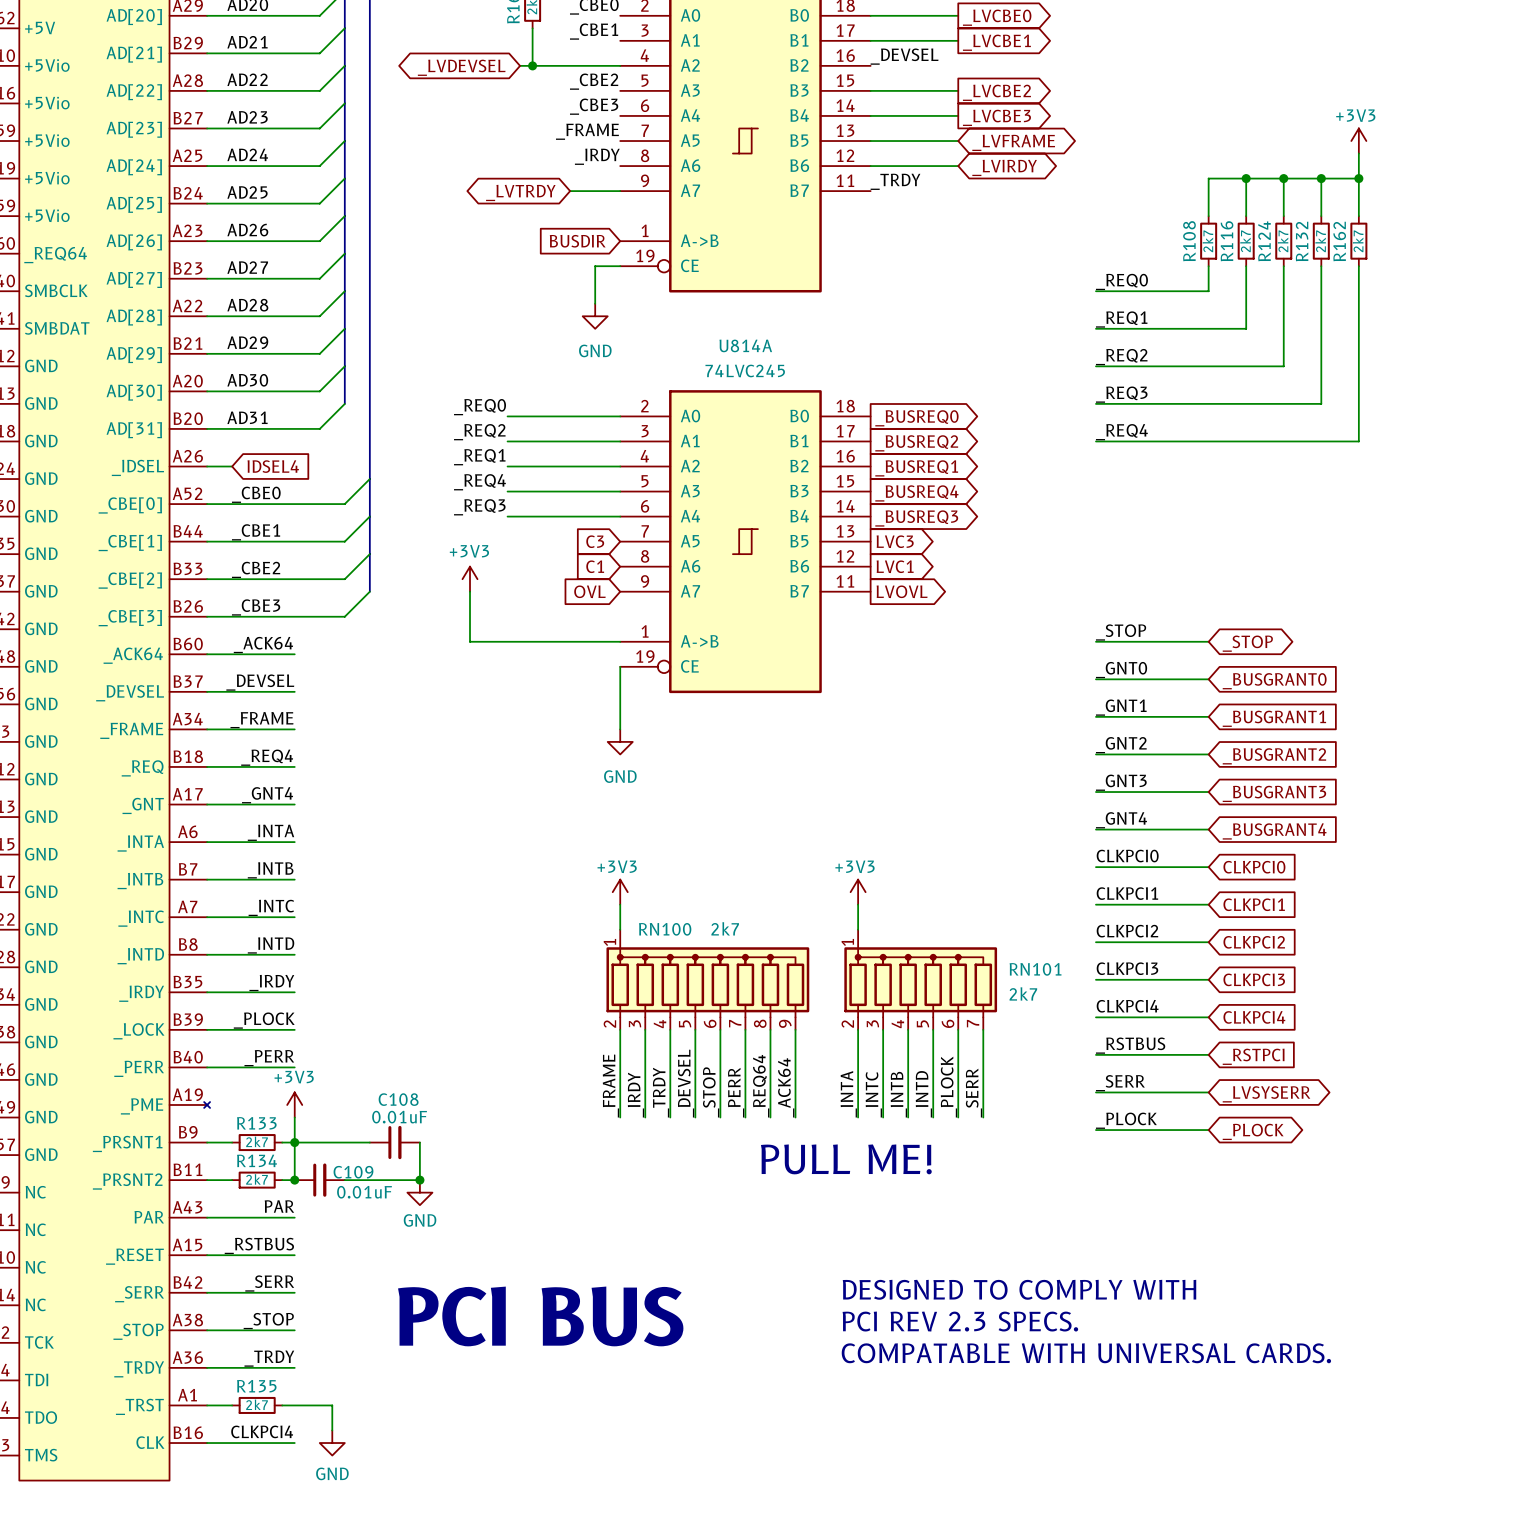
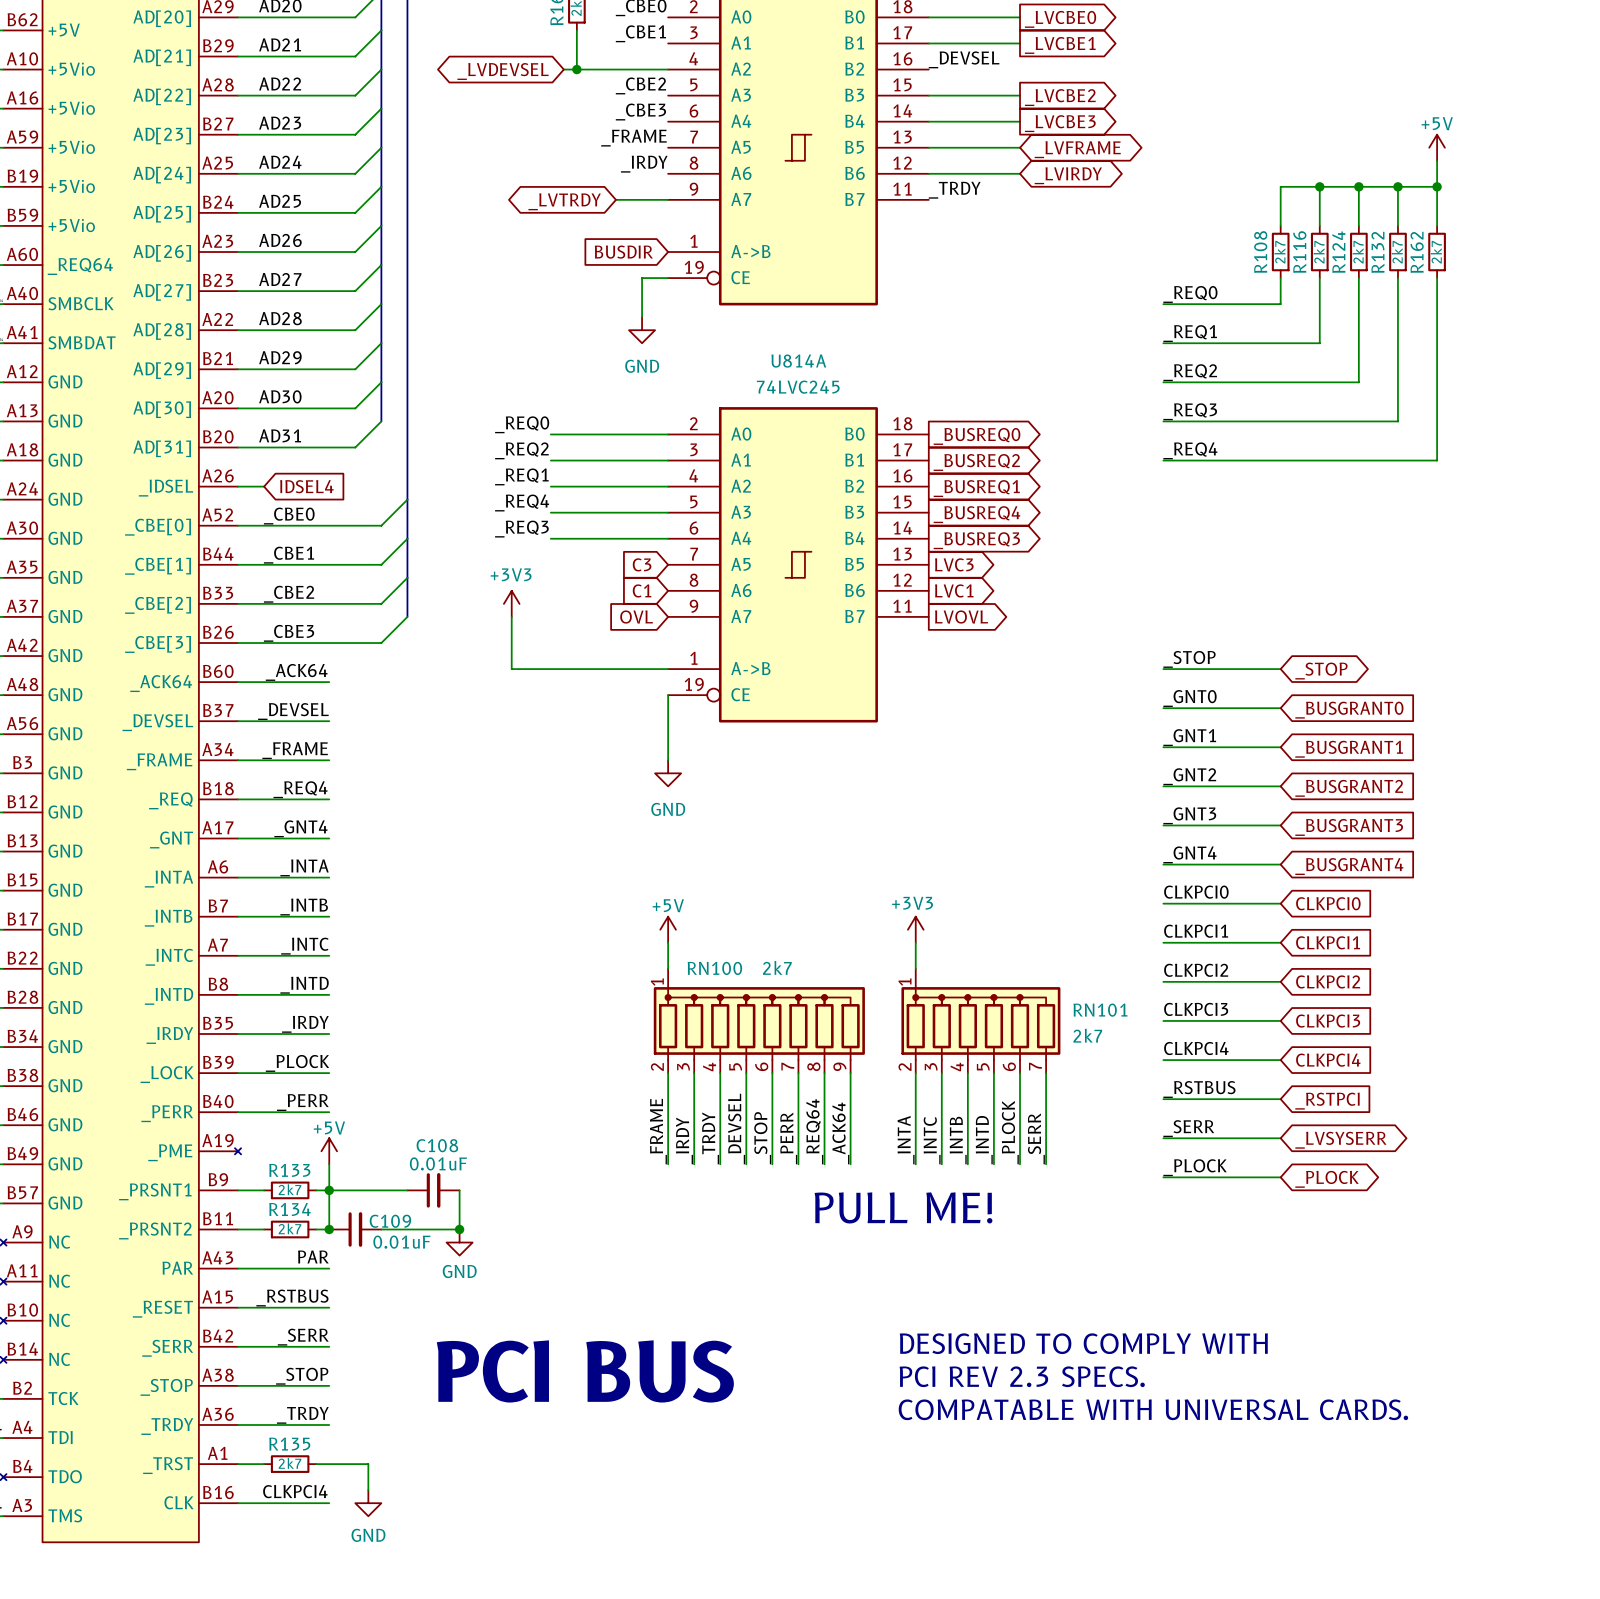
power symbol: +3V3 (1358, 141) -> +5V (1437, 147)
power symbol: +3V3 (620, 892) -> +5V (668, 929)
power symbol: +3V3 (294, 1104) -> +5V (329, 1151)

